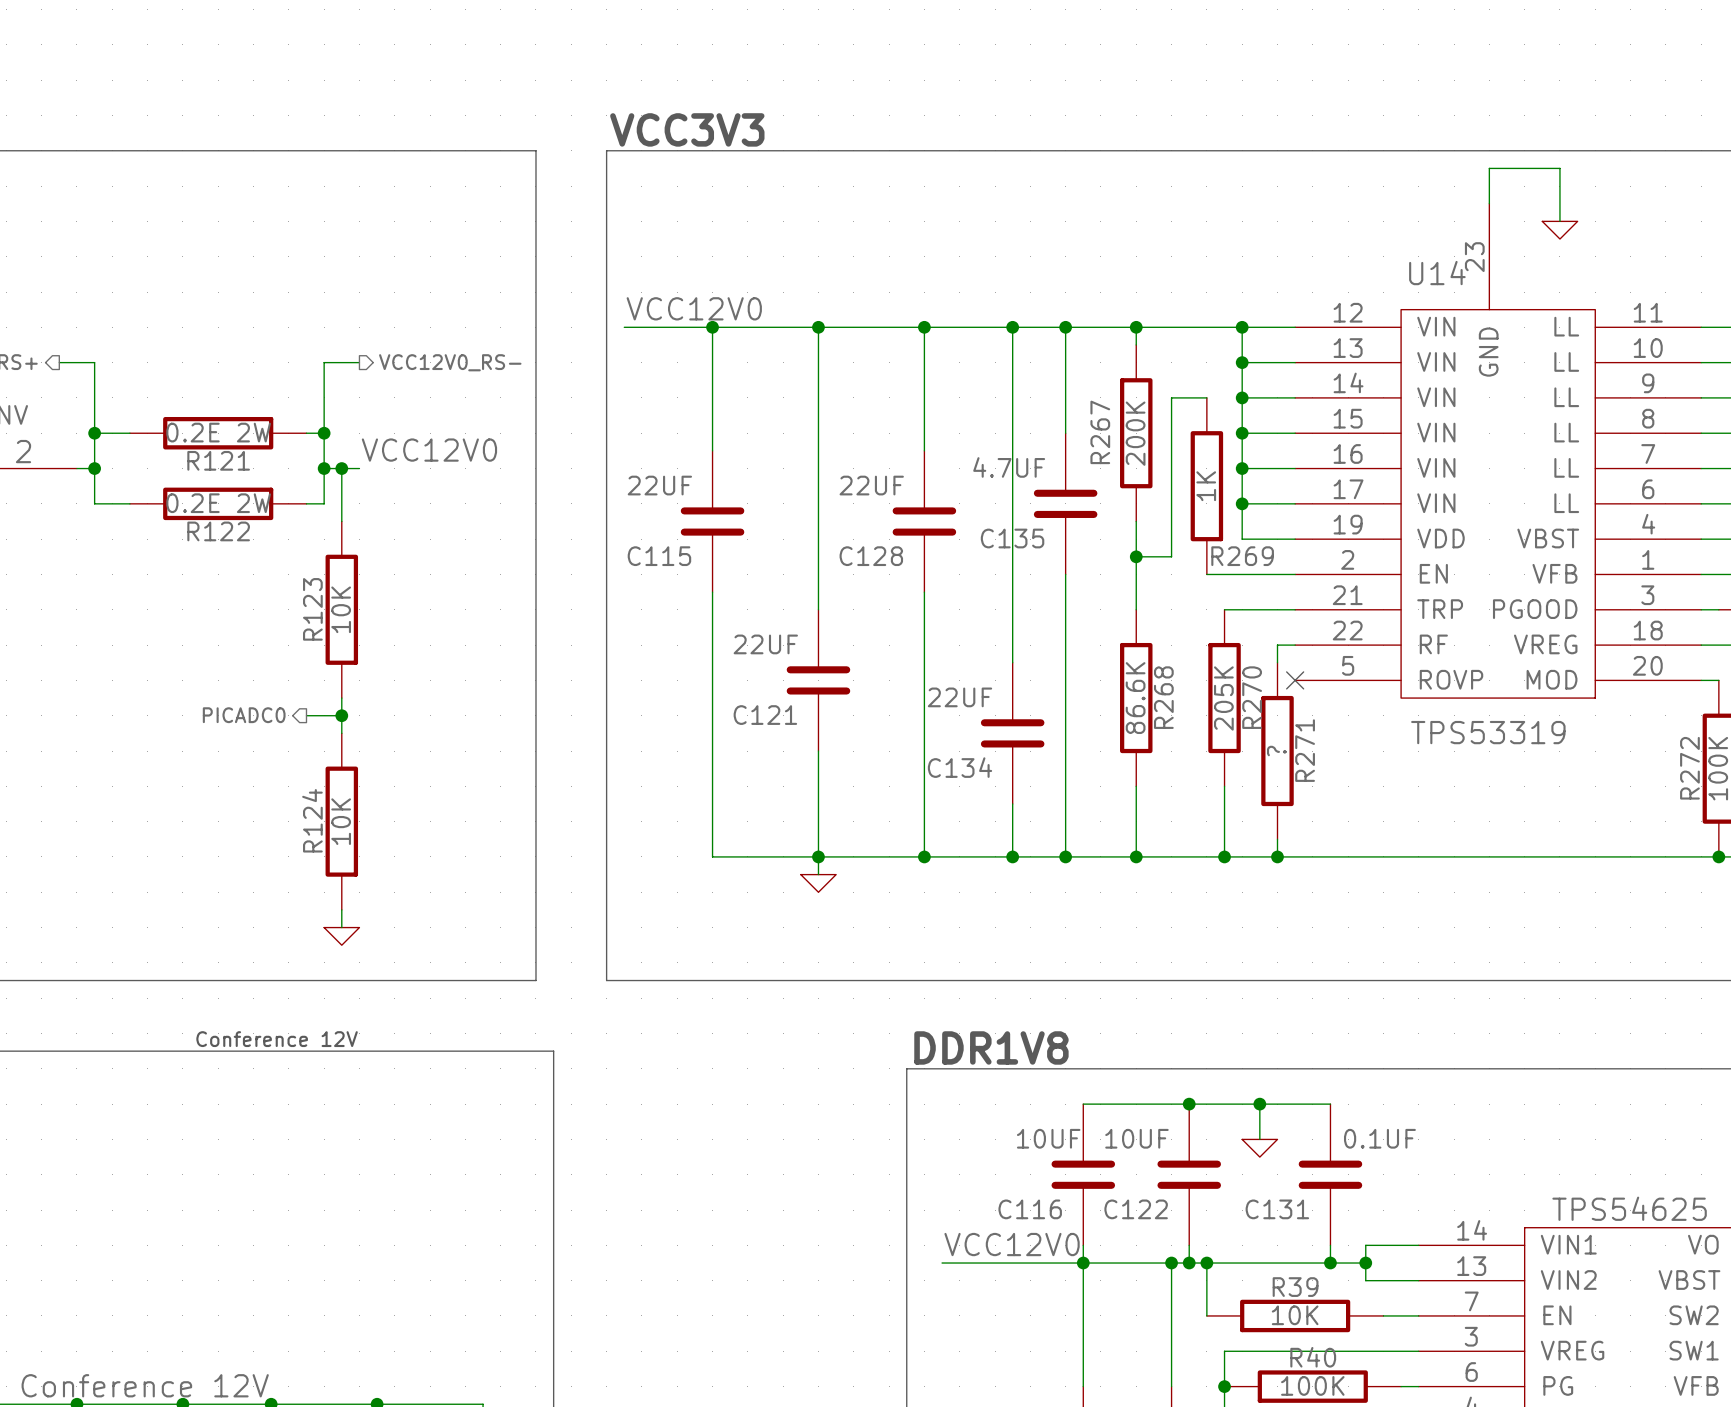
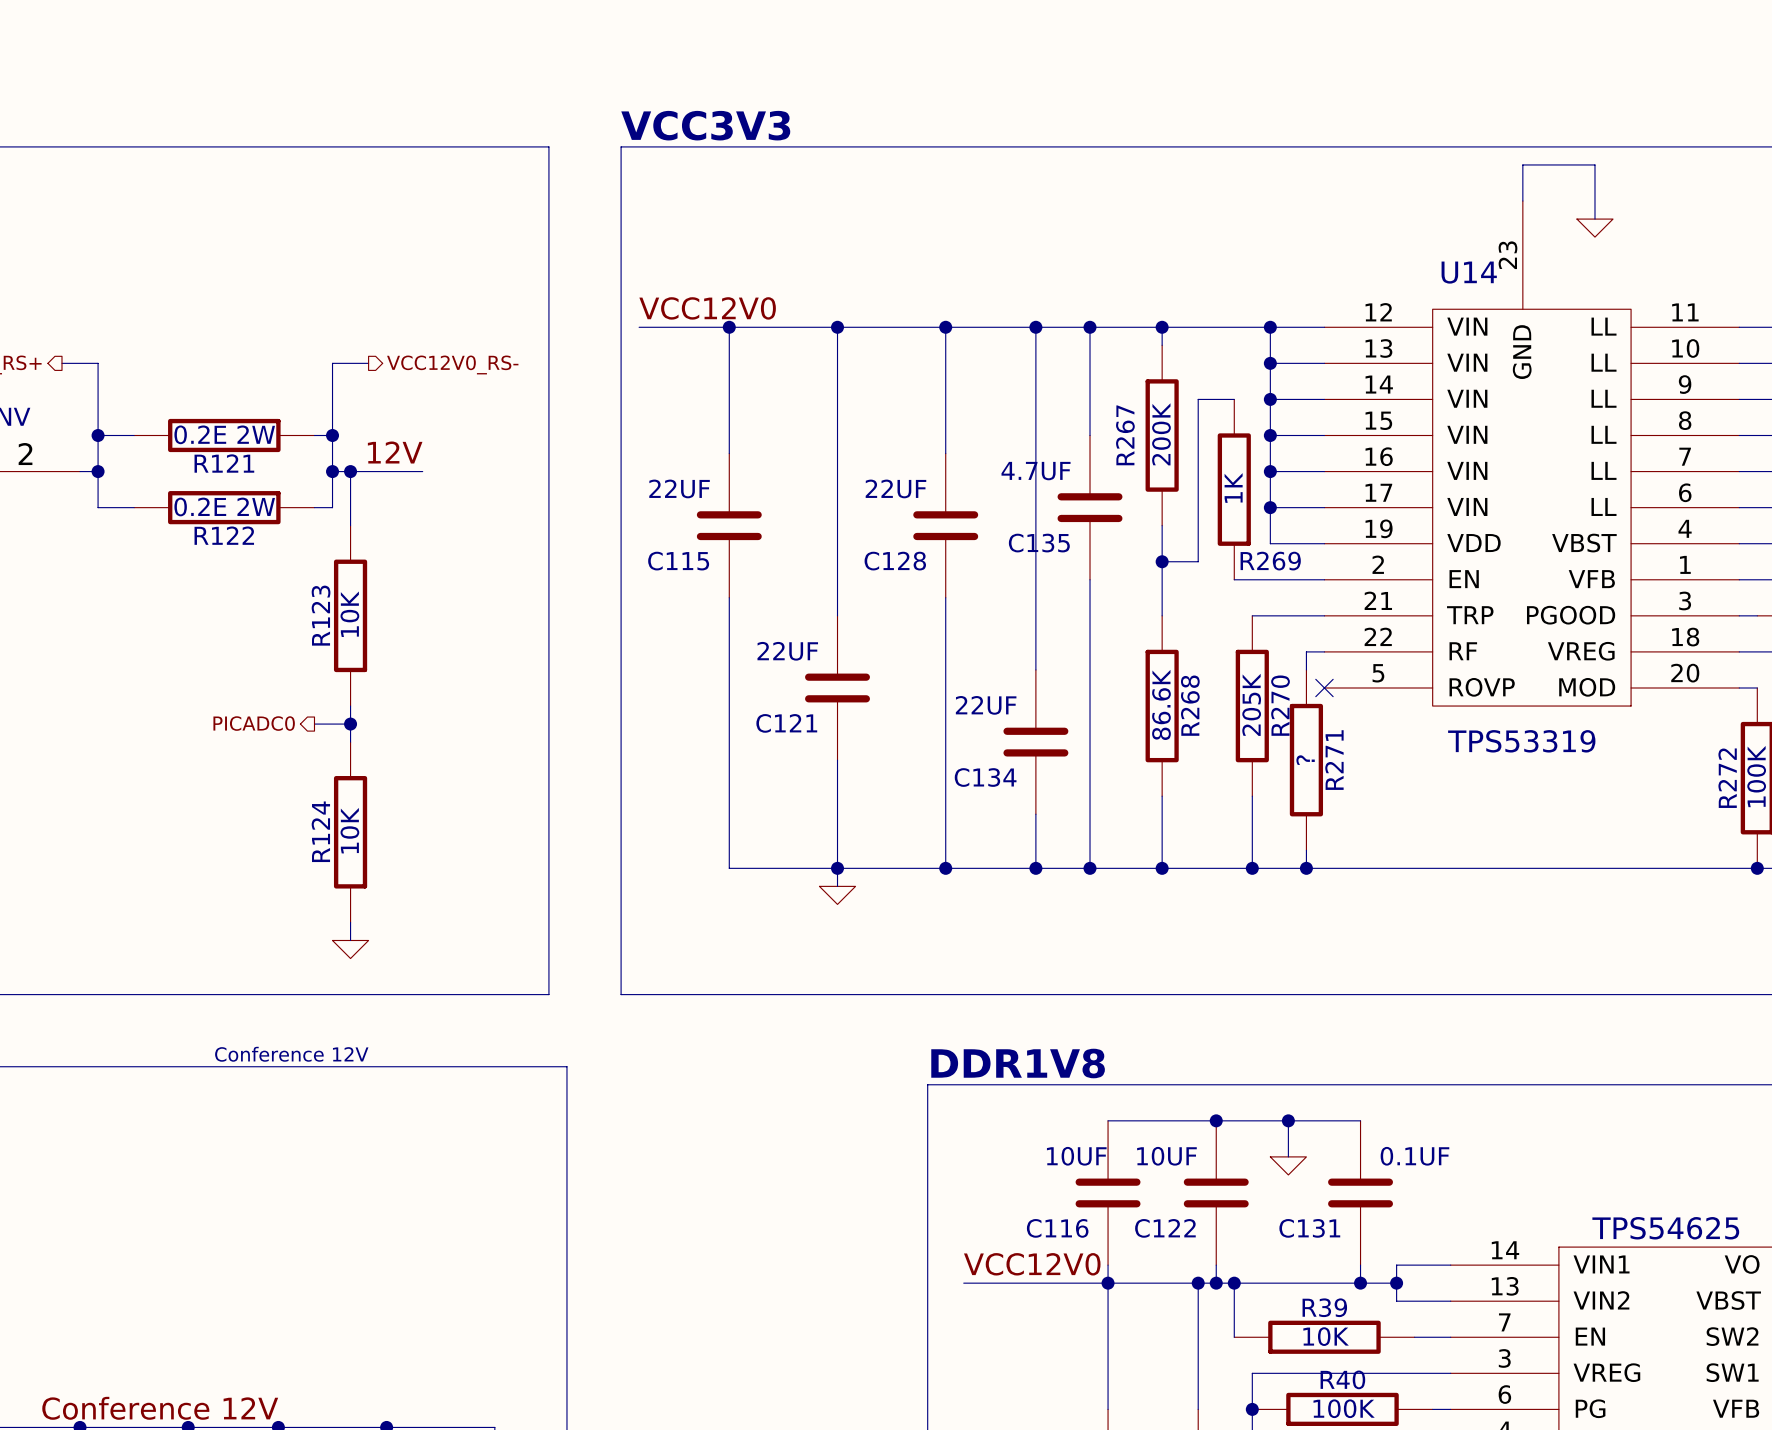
label: none -> 12V (395, 452)
label: VCC12V0 (429, 450) -> none
wire: none -> (368, 471) (422, 471)

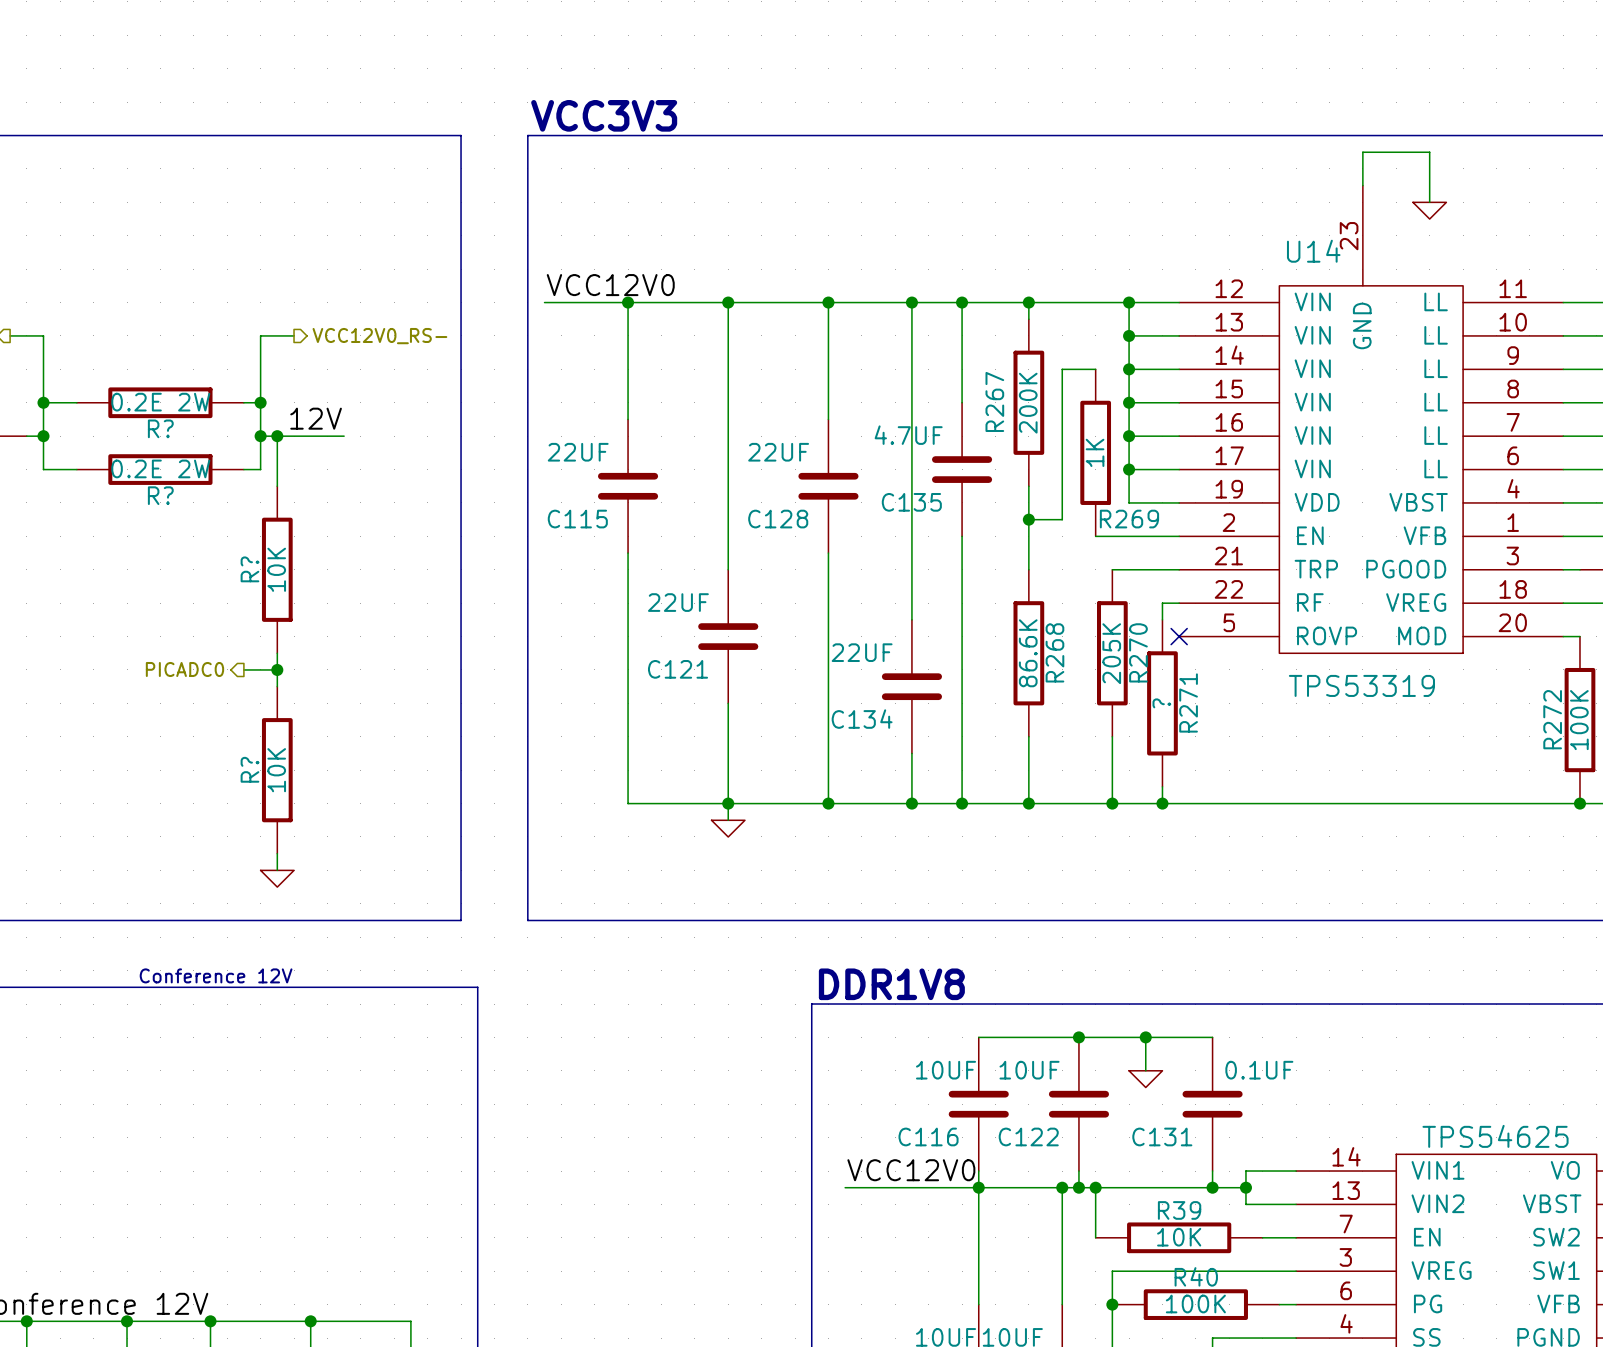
R121 name: R121 (224, 463) -> R? (160, 428)
R122 name: R122 (224, 535) -> R? (160, 495)
R123 name: R123 (321, 615) -> R? (249, 569)
R124 name: R124 (320, 831) -> R? (249, 769)

